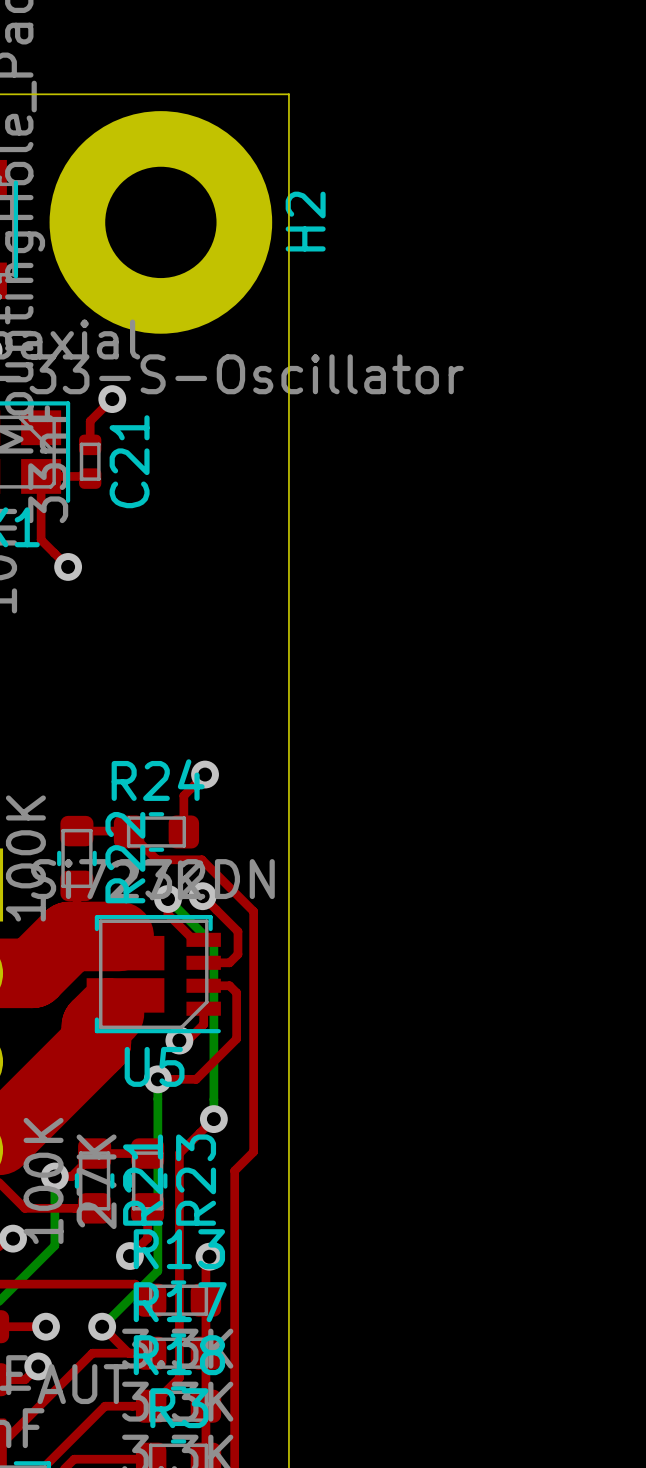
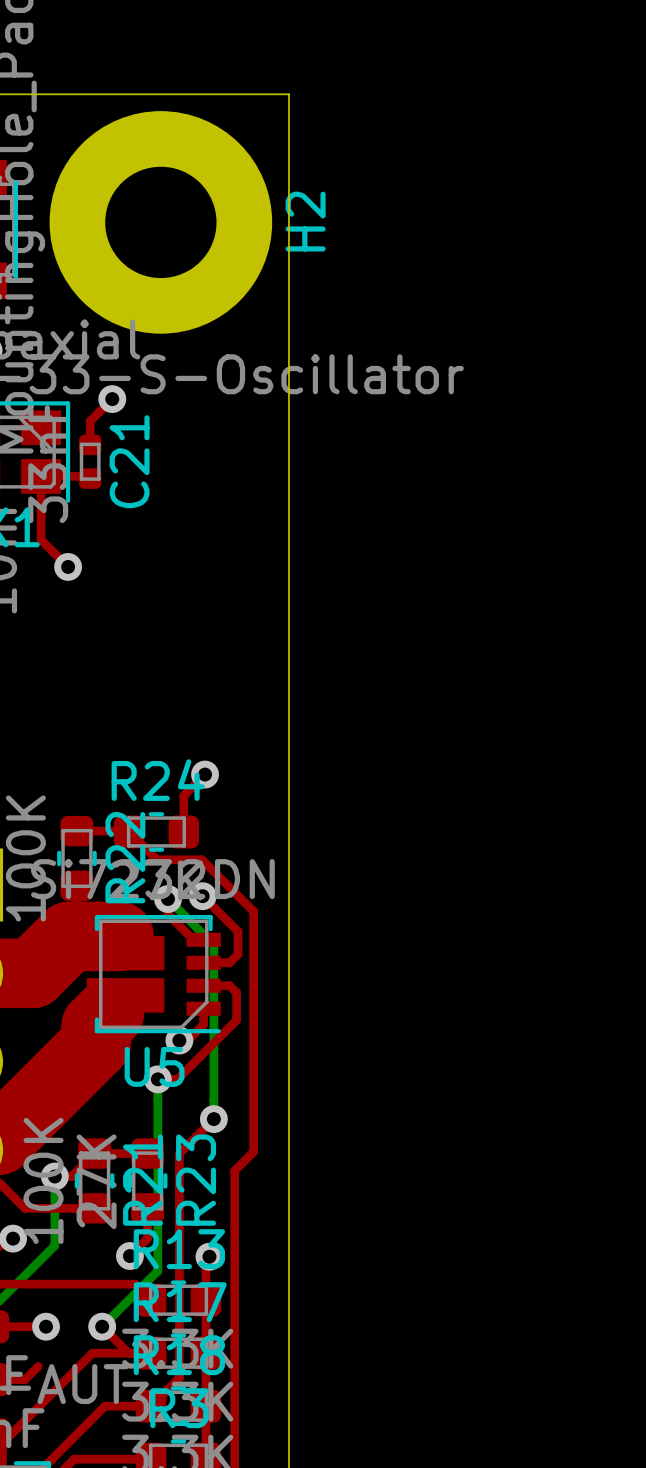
top track: (236, 1020) (236, 1038) (196, 1079) (177, 1079) -> (236, 1020) (177, 1079)
via: (38, 1366) -> none

